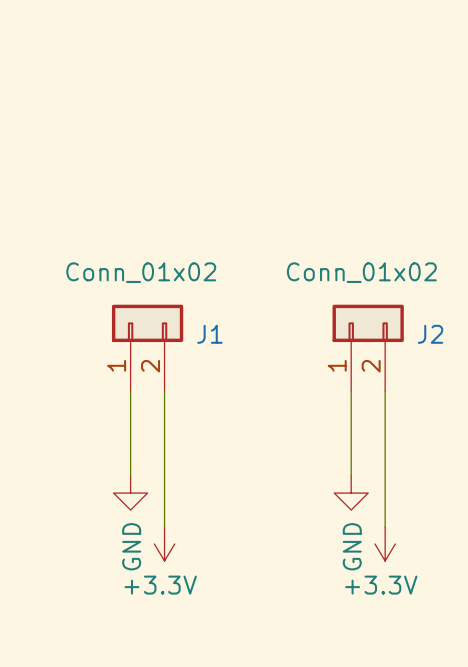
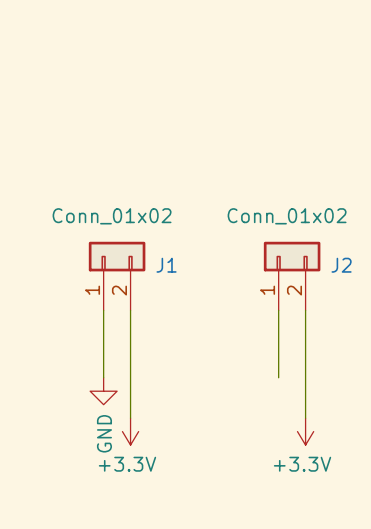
power symbol: GND (351, 493) -> none

